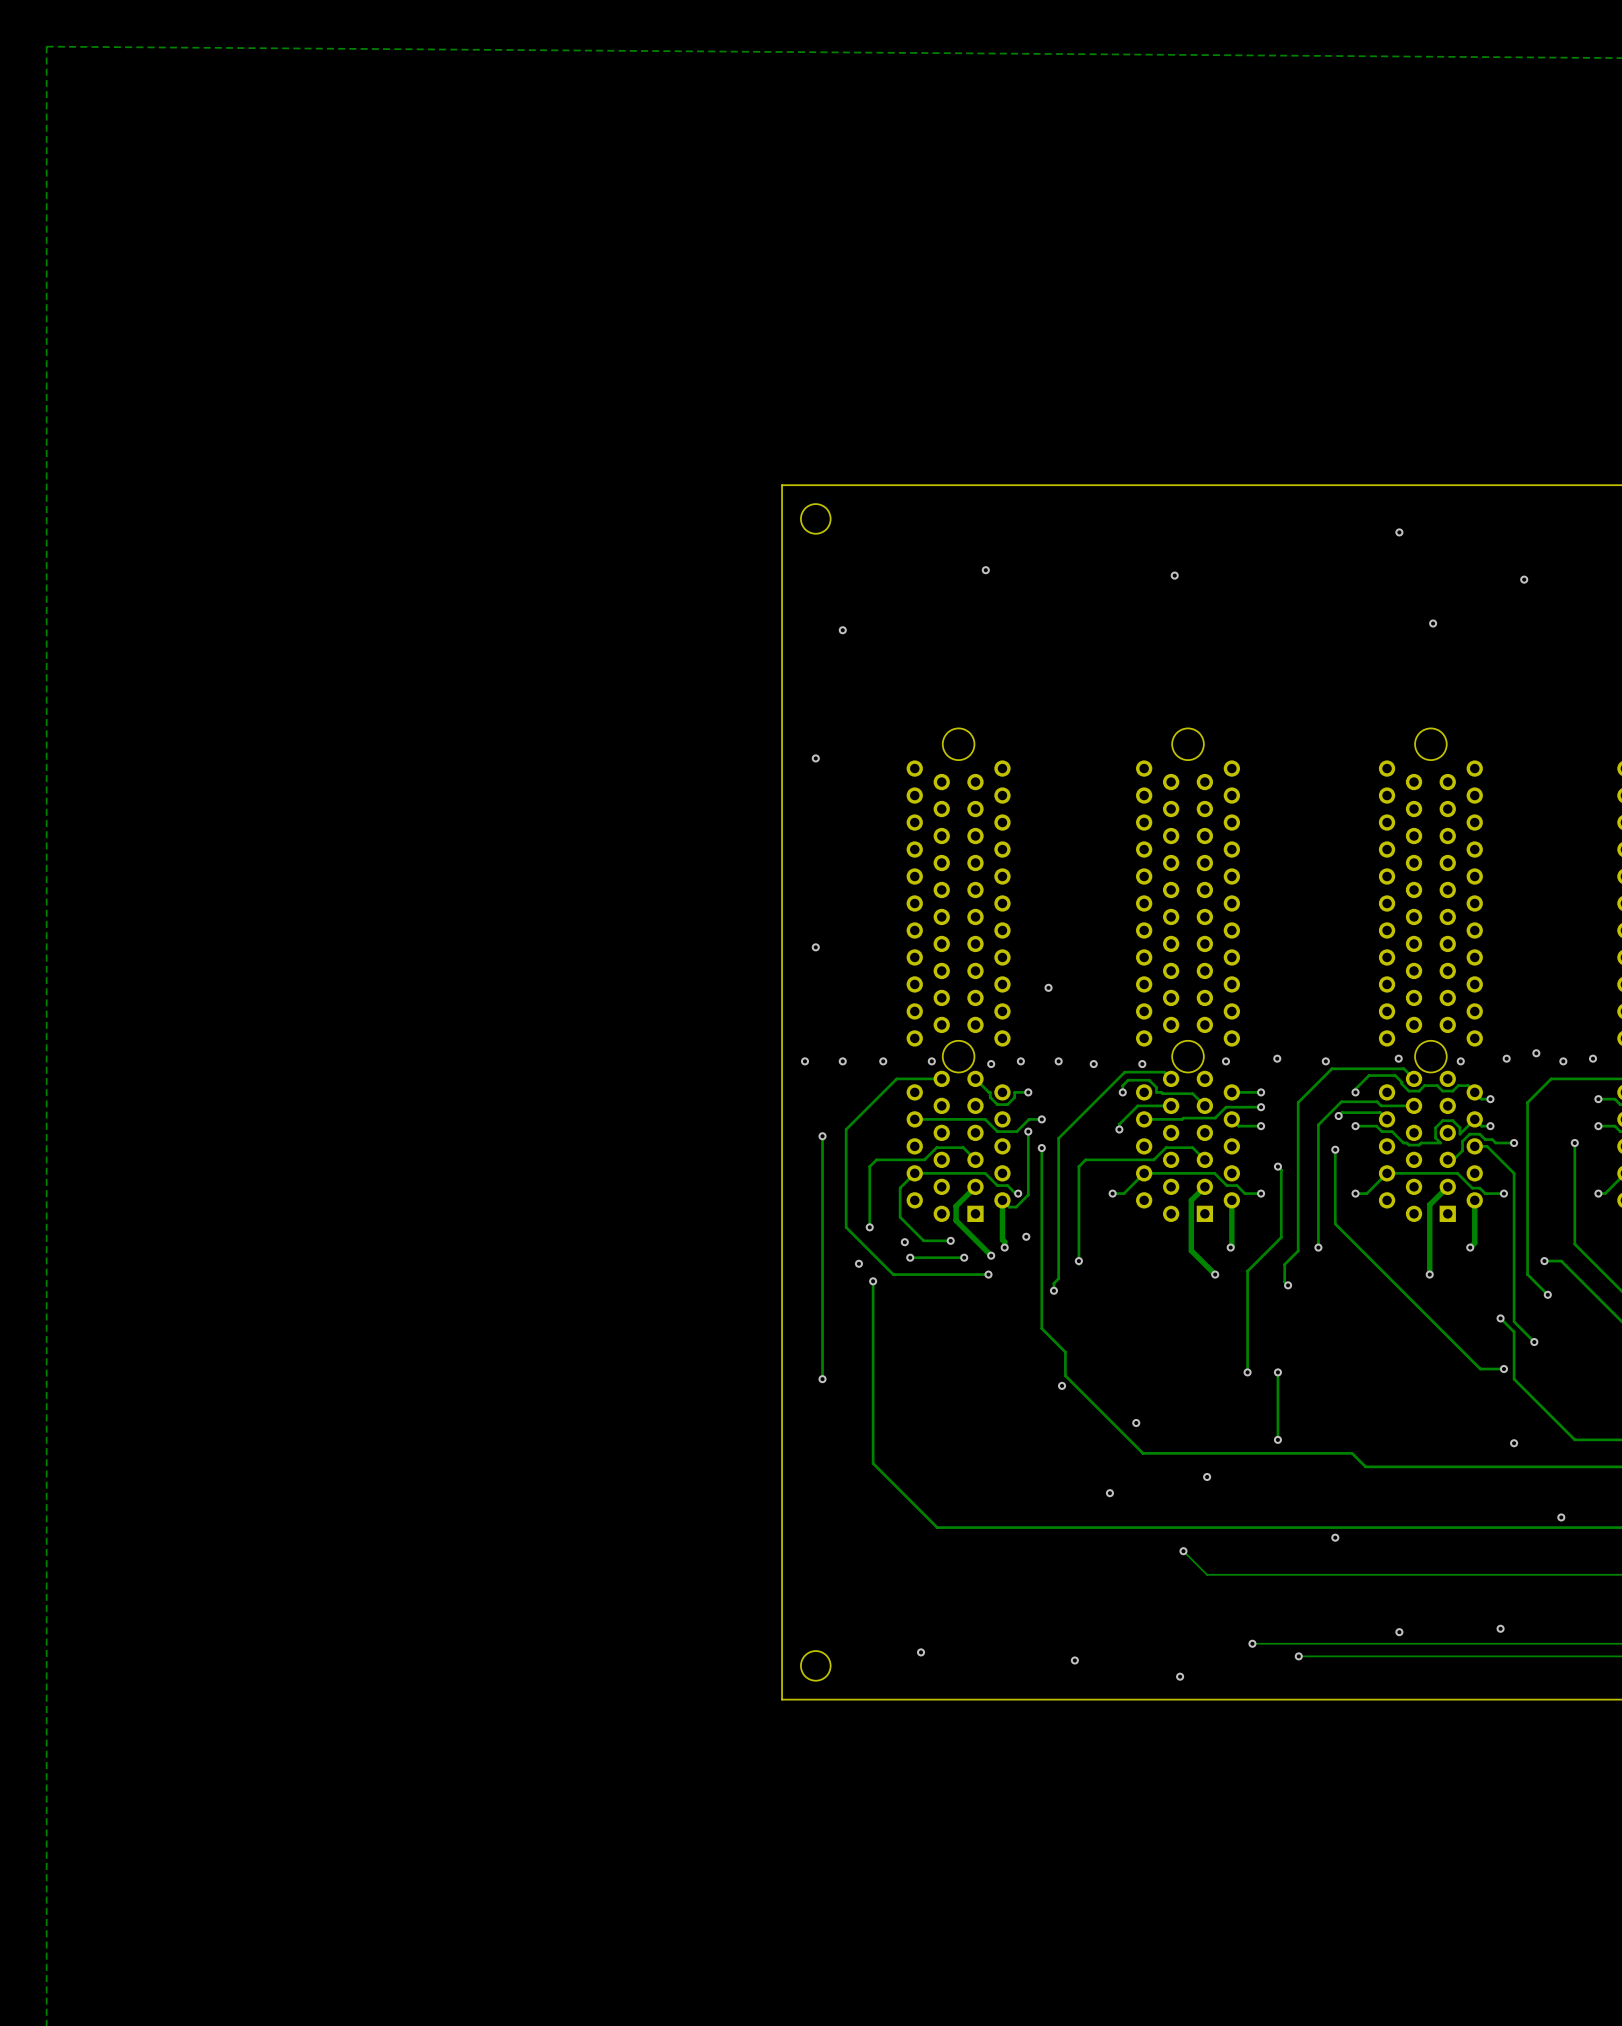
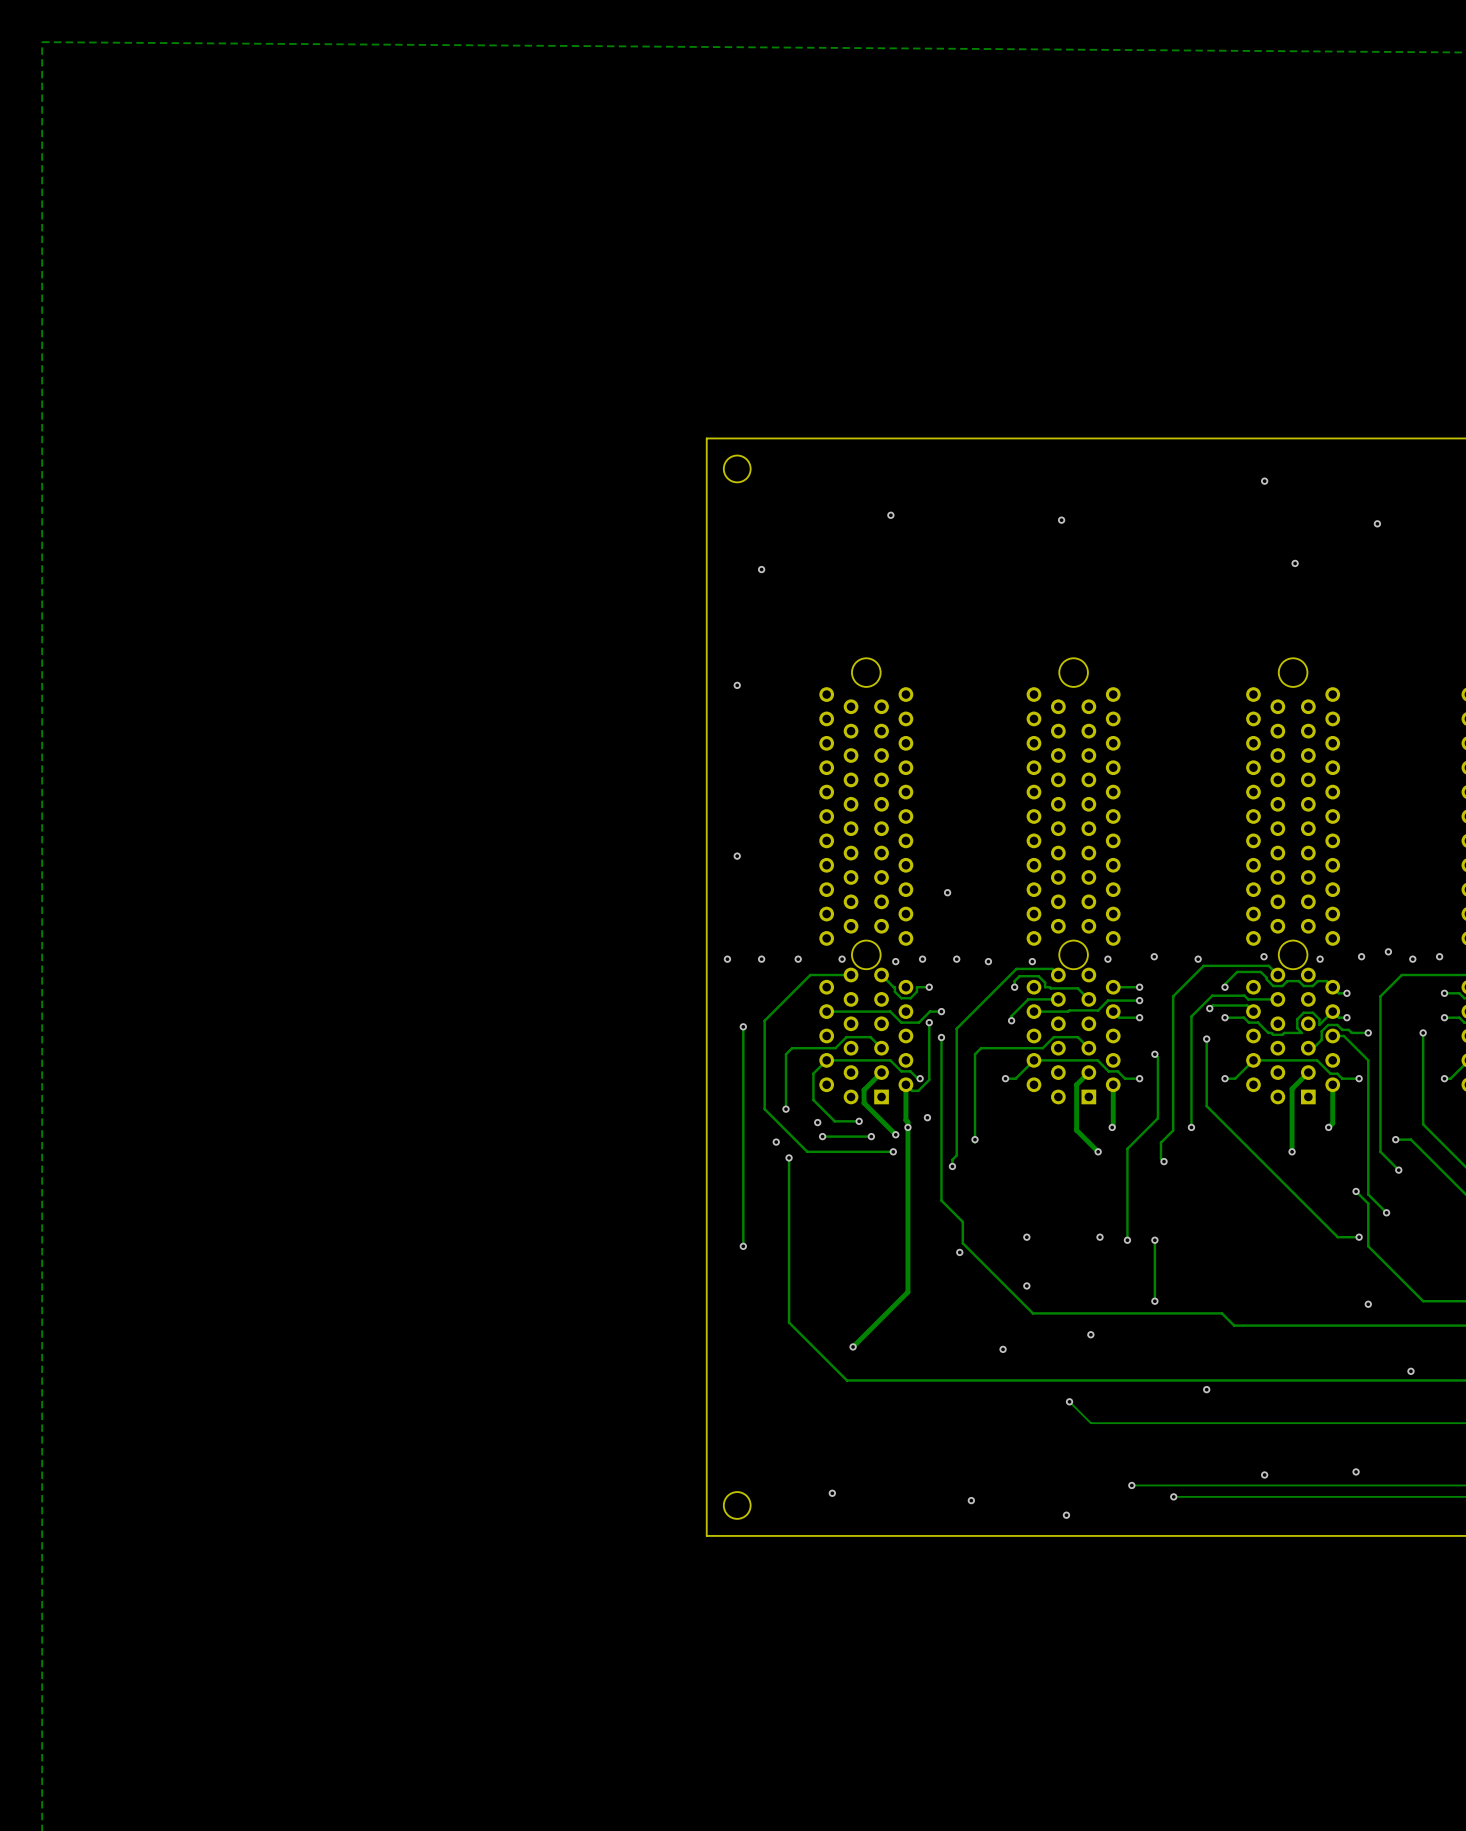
track: none -> (907, 1127) (907, 1292) (853, 1346)
via: none -> (1026, 1237)
via: none -> (1100, 1237)
via: none -> (853, 1346)

